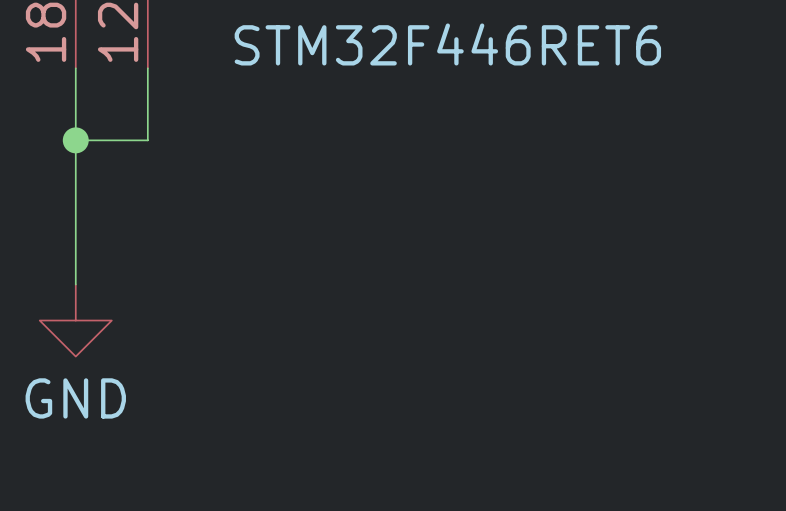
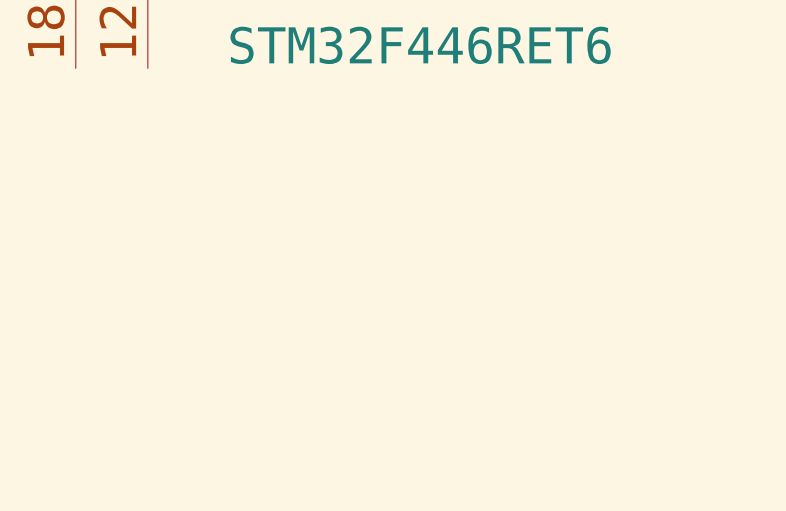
wire: (75, 68) (75, 284) -> none
wire: (147, 68) (147, 140) (75, 140) -> none
junction: (75, 140) -> none
power symbol: GND (75, 320) -> none

